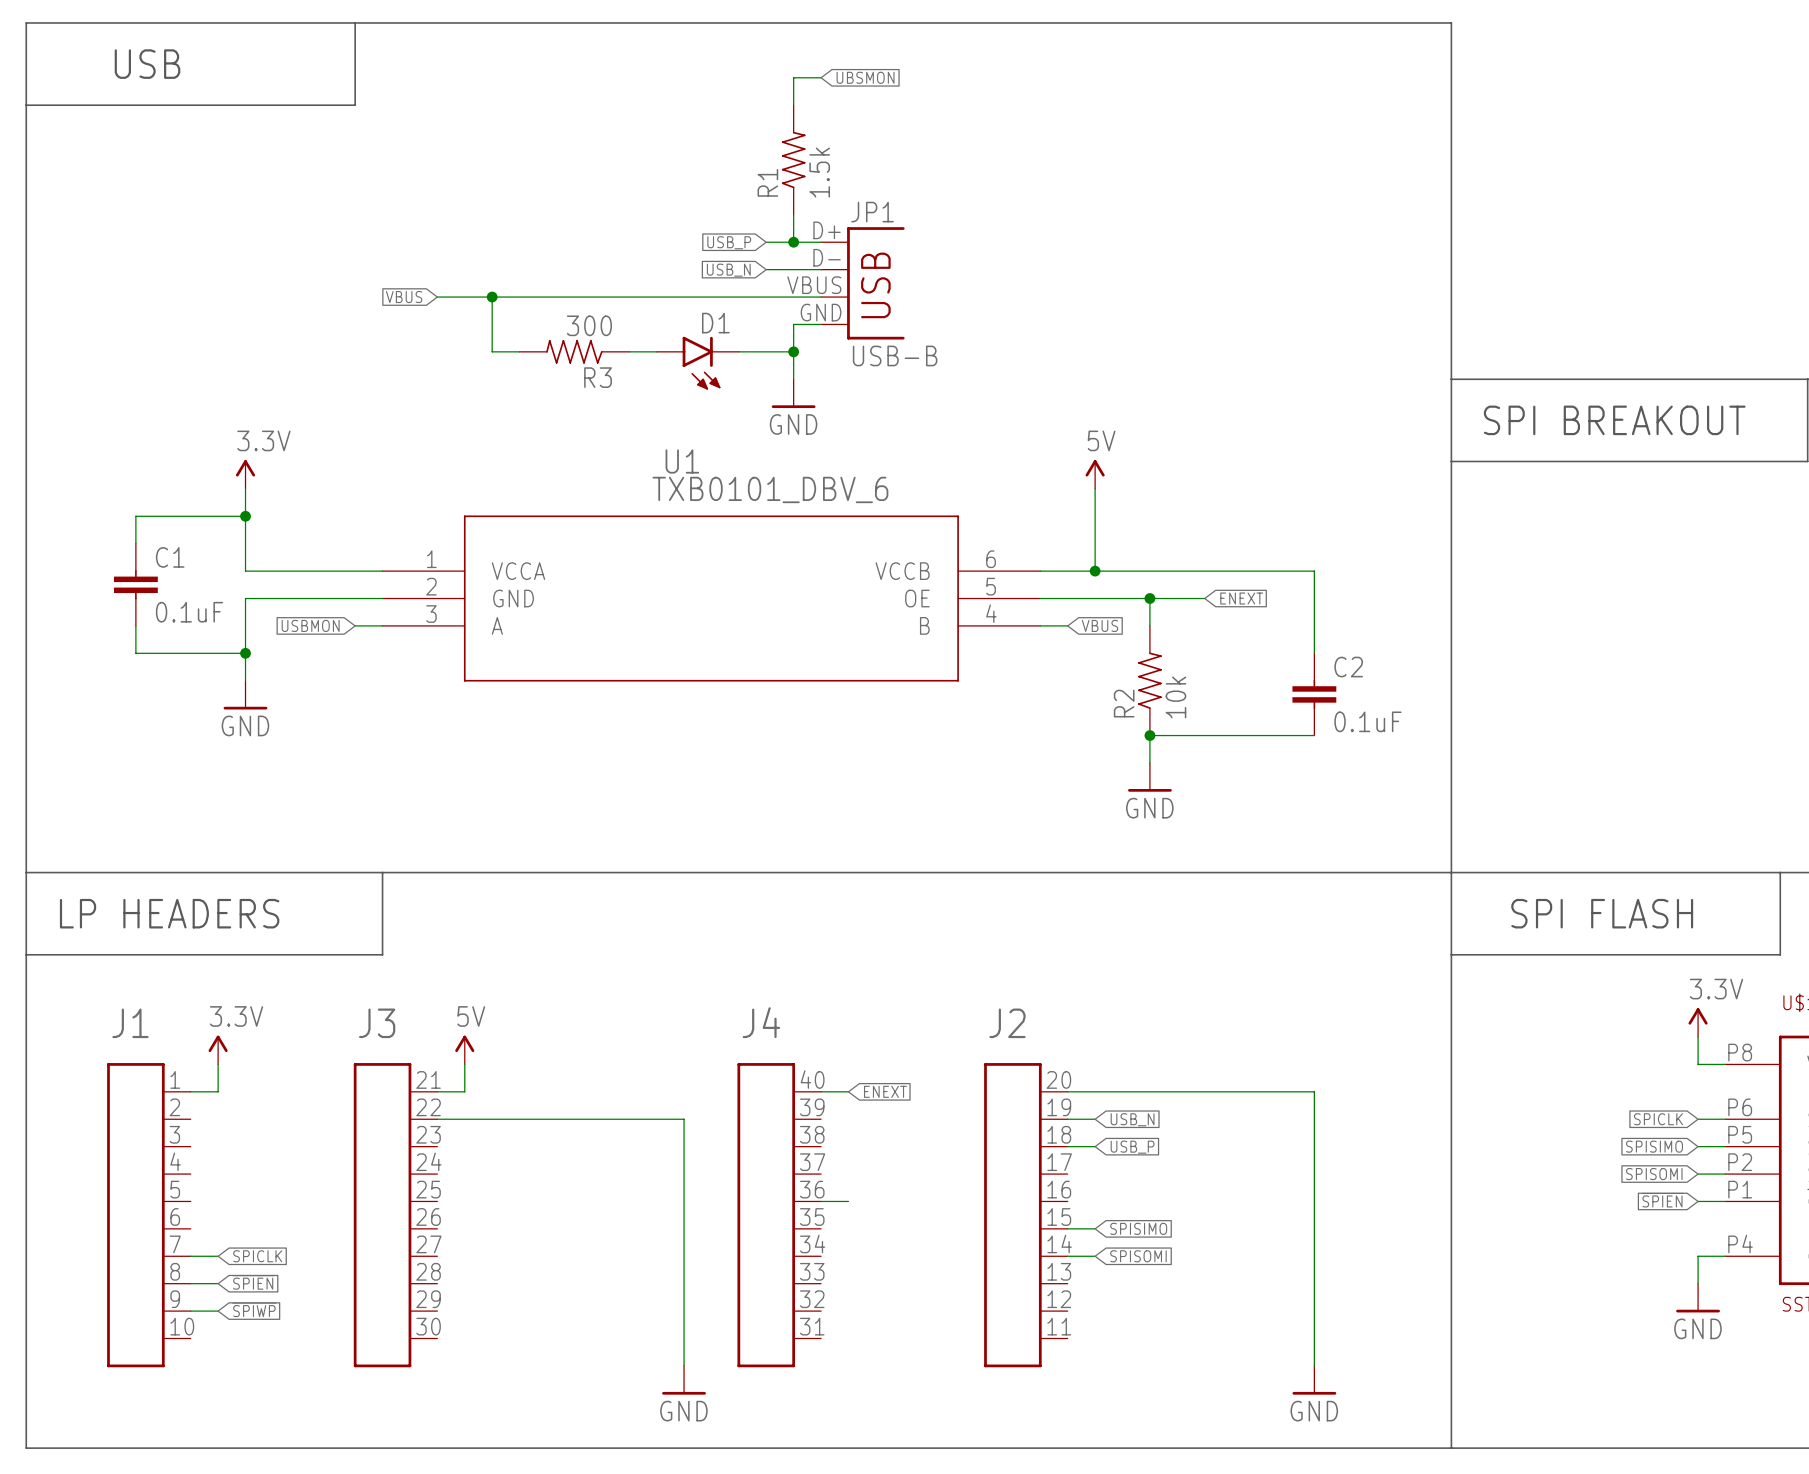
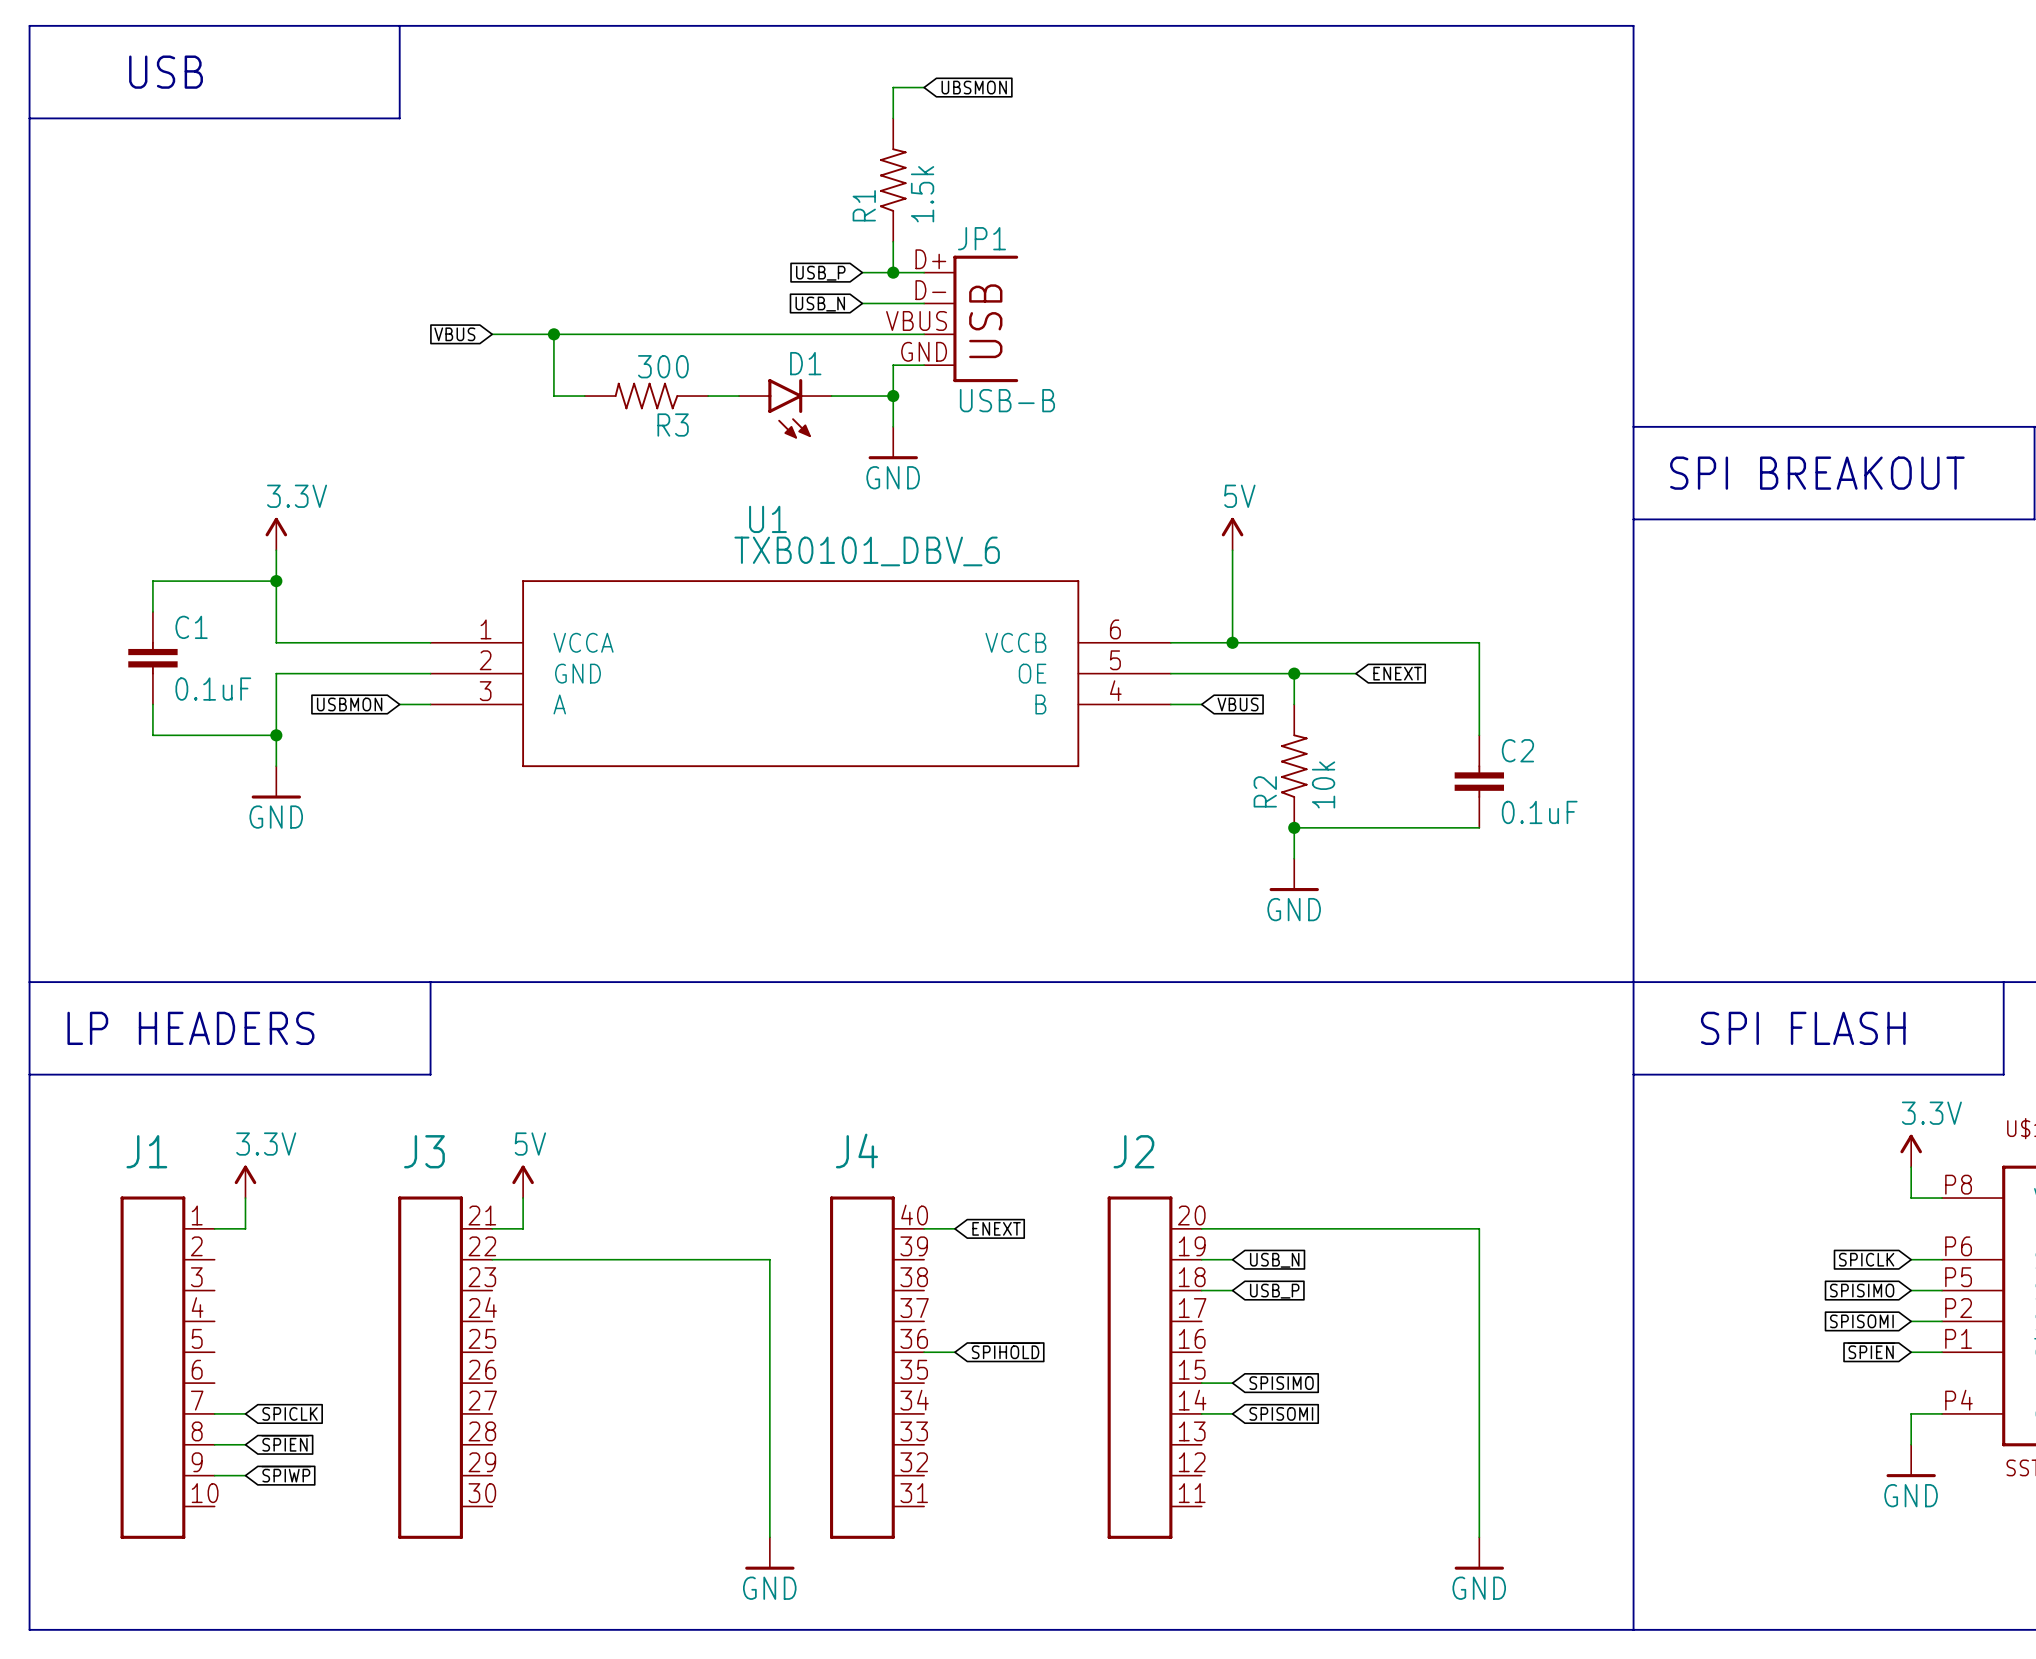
global label: none -> ~{SPIHOLD} (1005, 1350)

